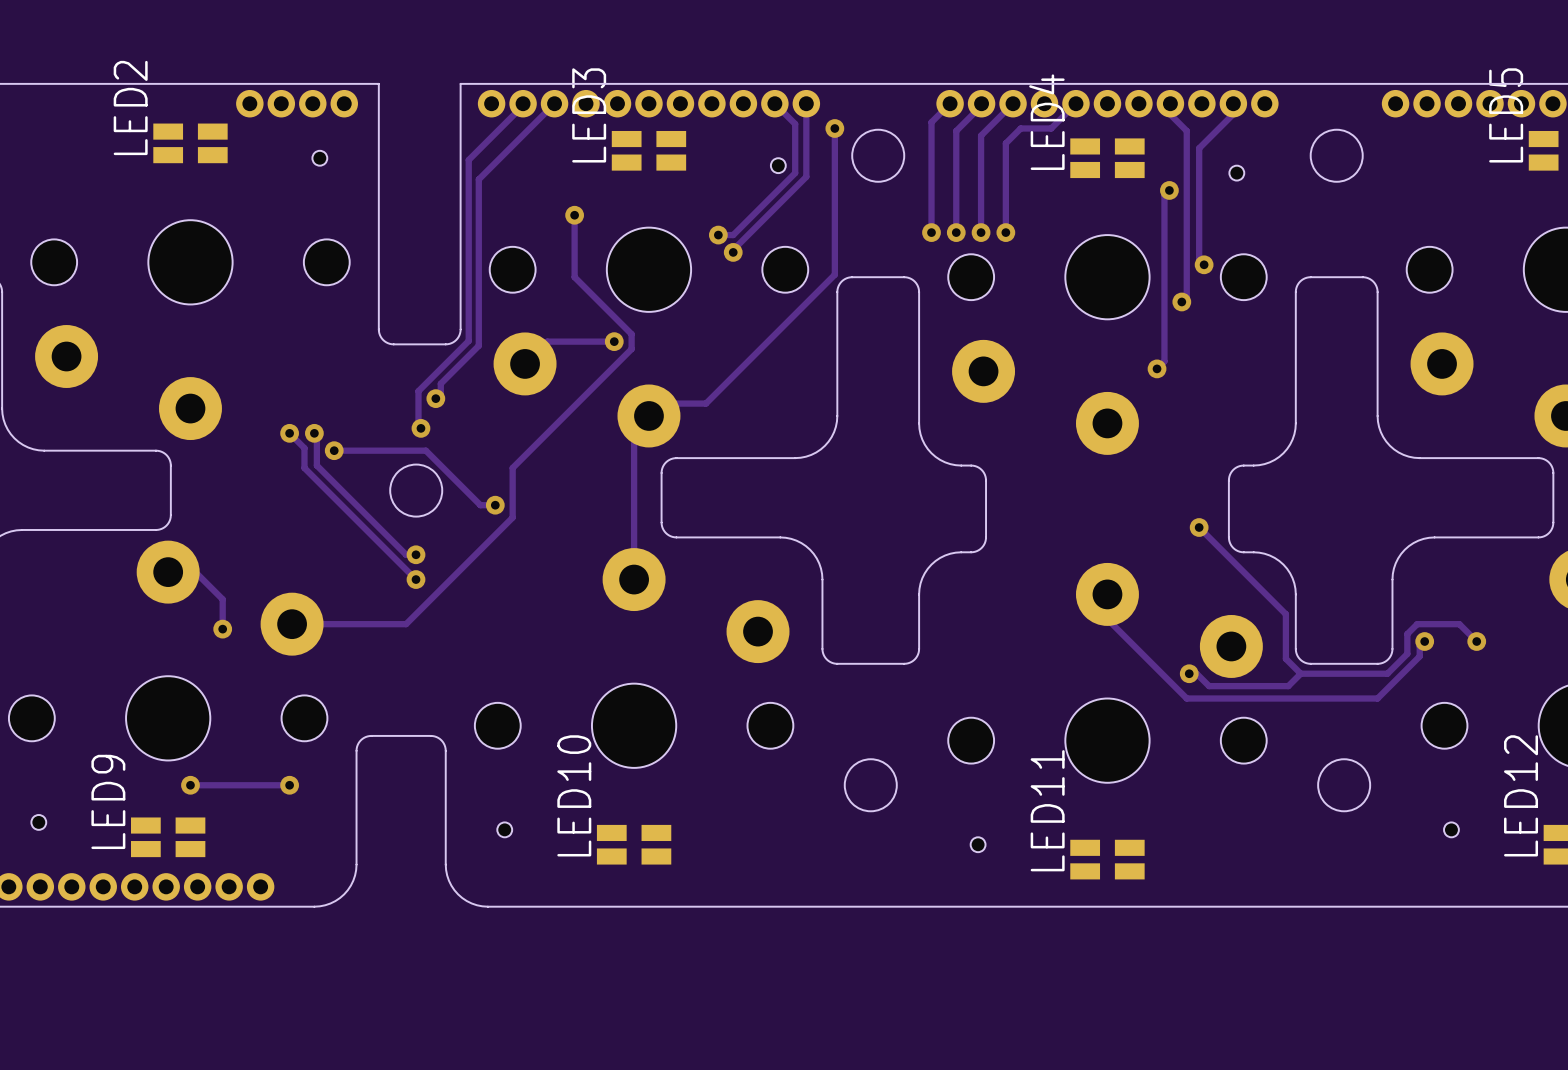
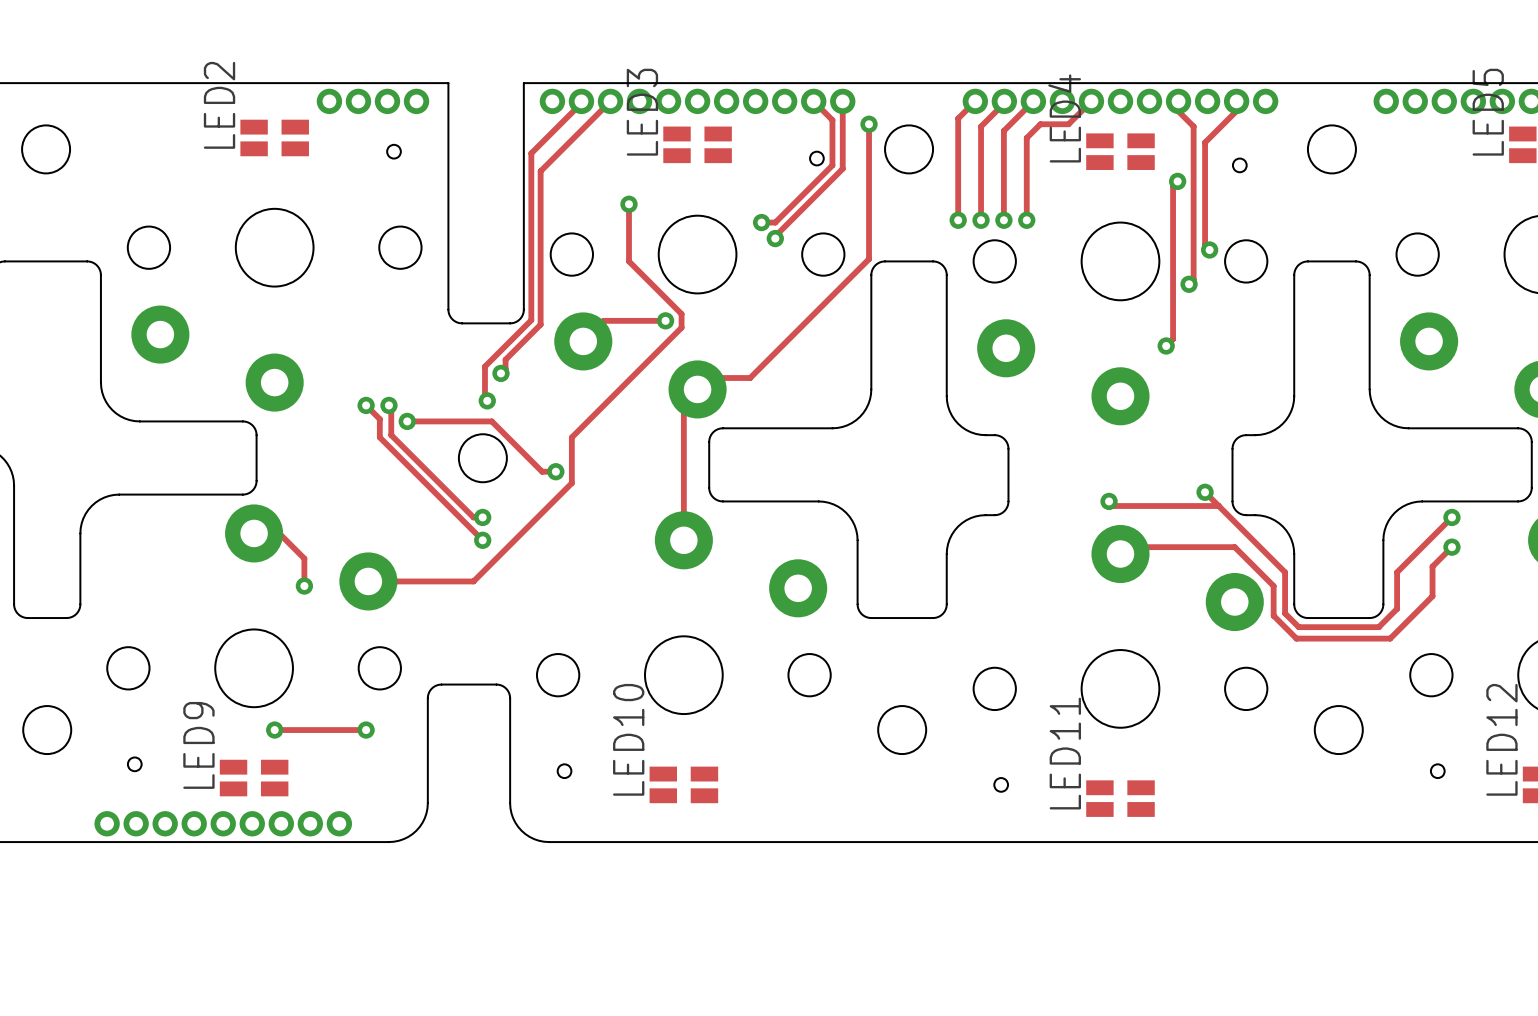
track: none -> (1109, 501) (1113, 506) (1218, 506)
via: none -> (1109, 501)
via: none -> (1451, 517)
via: none -> (1451, 547)
track: (1107, 594) (1107, 619) (1186, 698) (1377, 698) (1419, 656) (1419, 646) (1424, 641) -> (1120, 554) (1127, 547) (1234, 547) (1273, 586) (1273, 615) (1296, 638) (1390, 638) (1432, 596) (1432, 566) (1451, 547)
track: (1407, 634) (1417, 624) (1459, 624) (1476, 641) -> (1397, 590) (1397, 572) (1451, 517)
via: (1424, 641) -> none
via: (1476, 641) -> none
track: (1189, 673) (1196, 673) (1209, 686) (1288, 686) (1300, 673) -> none
via: (1189, 673) -> none

